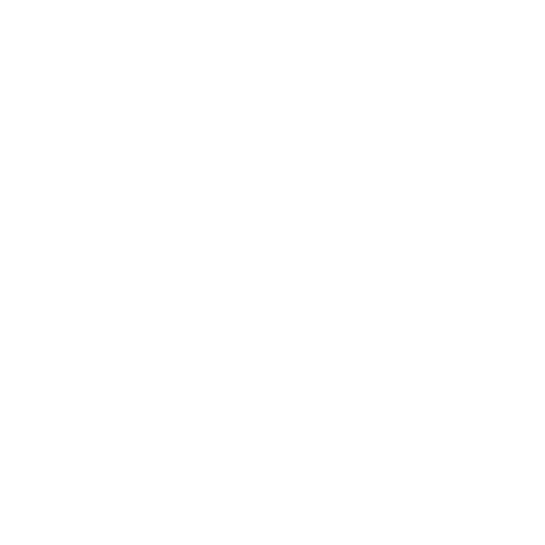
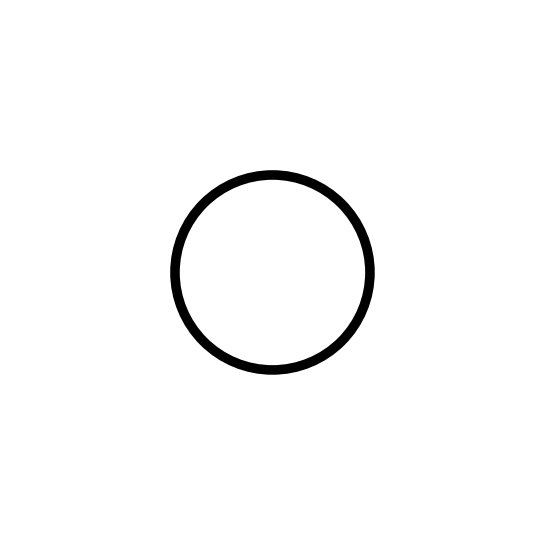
round board edge: none -> [170, 170, 375, 375]

